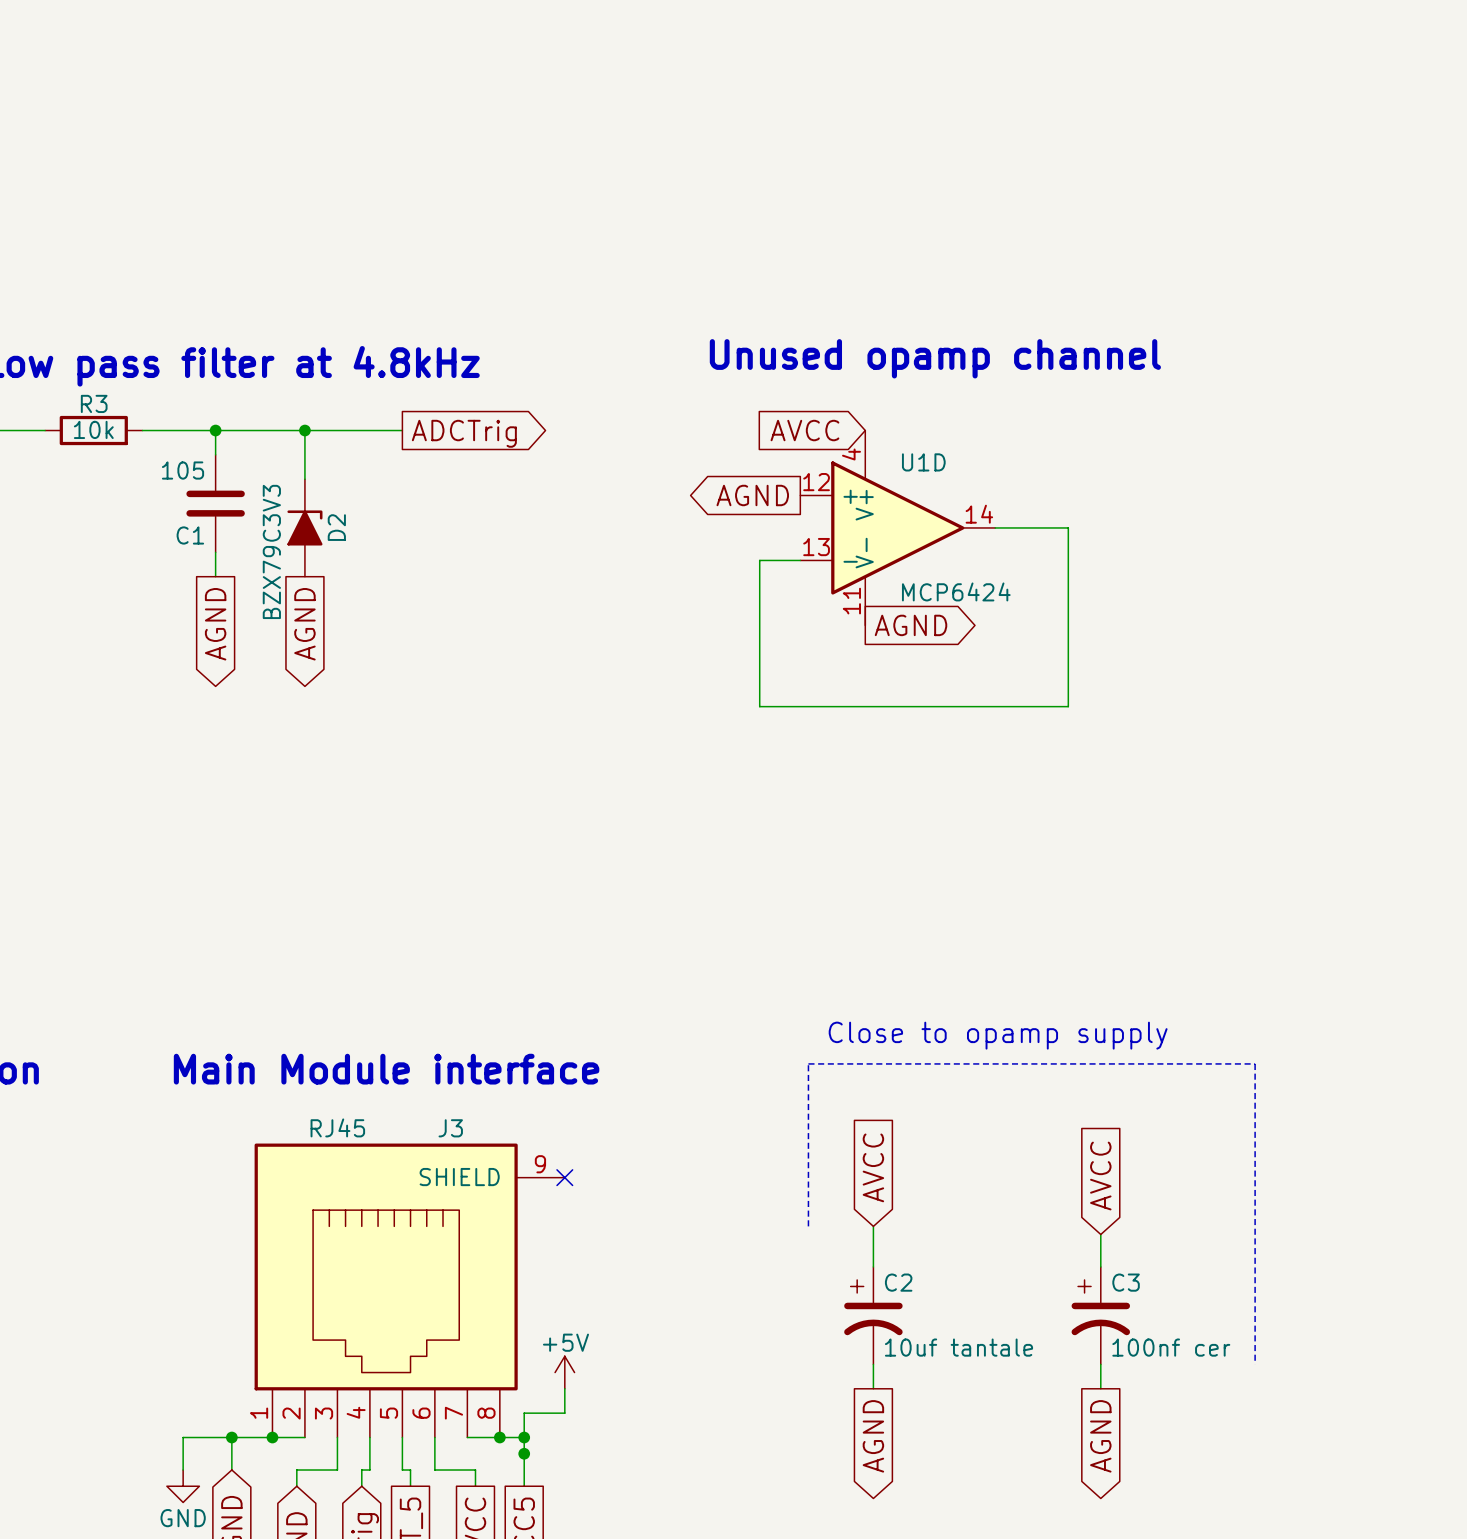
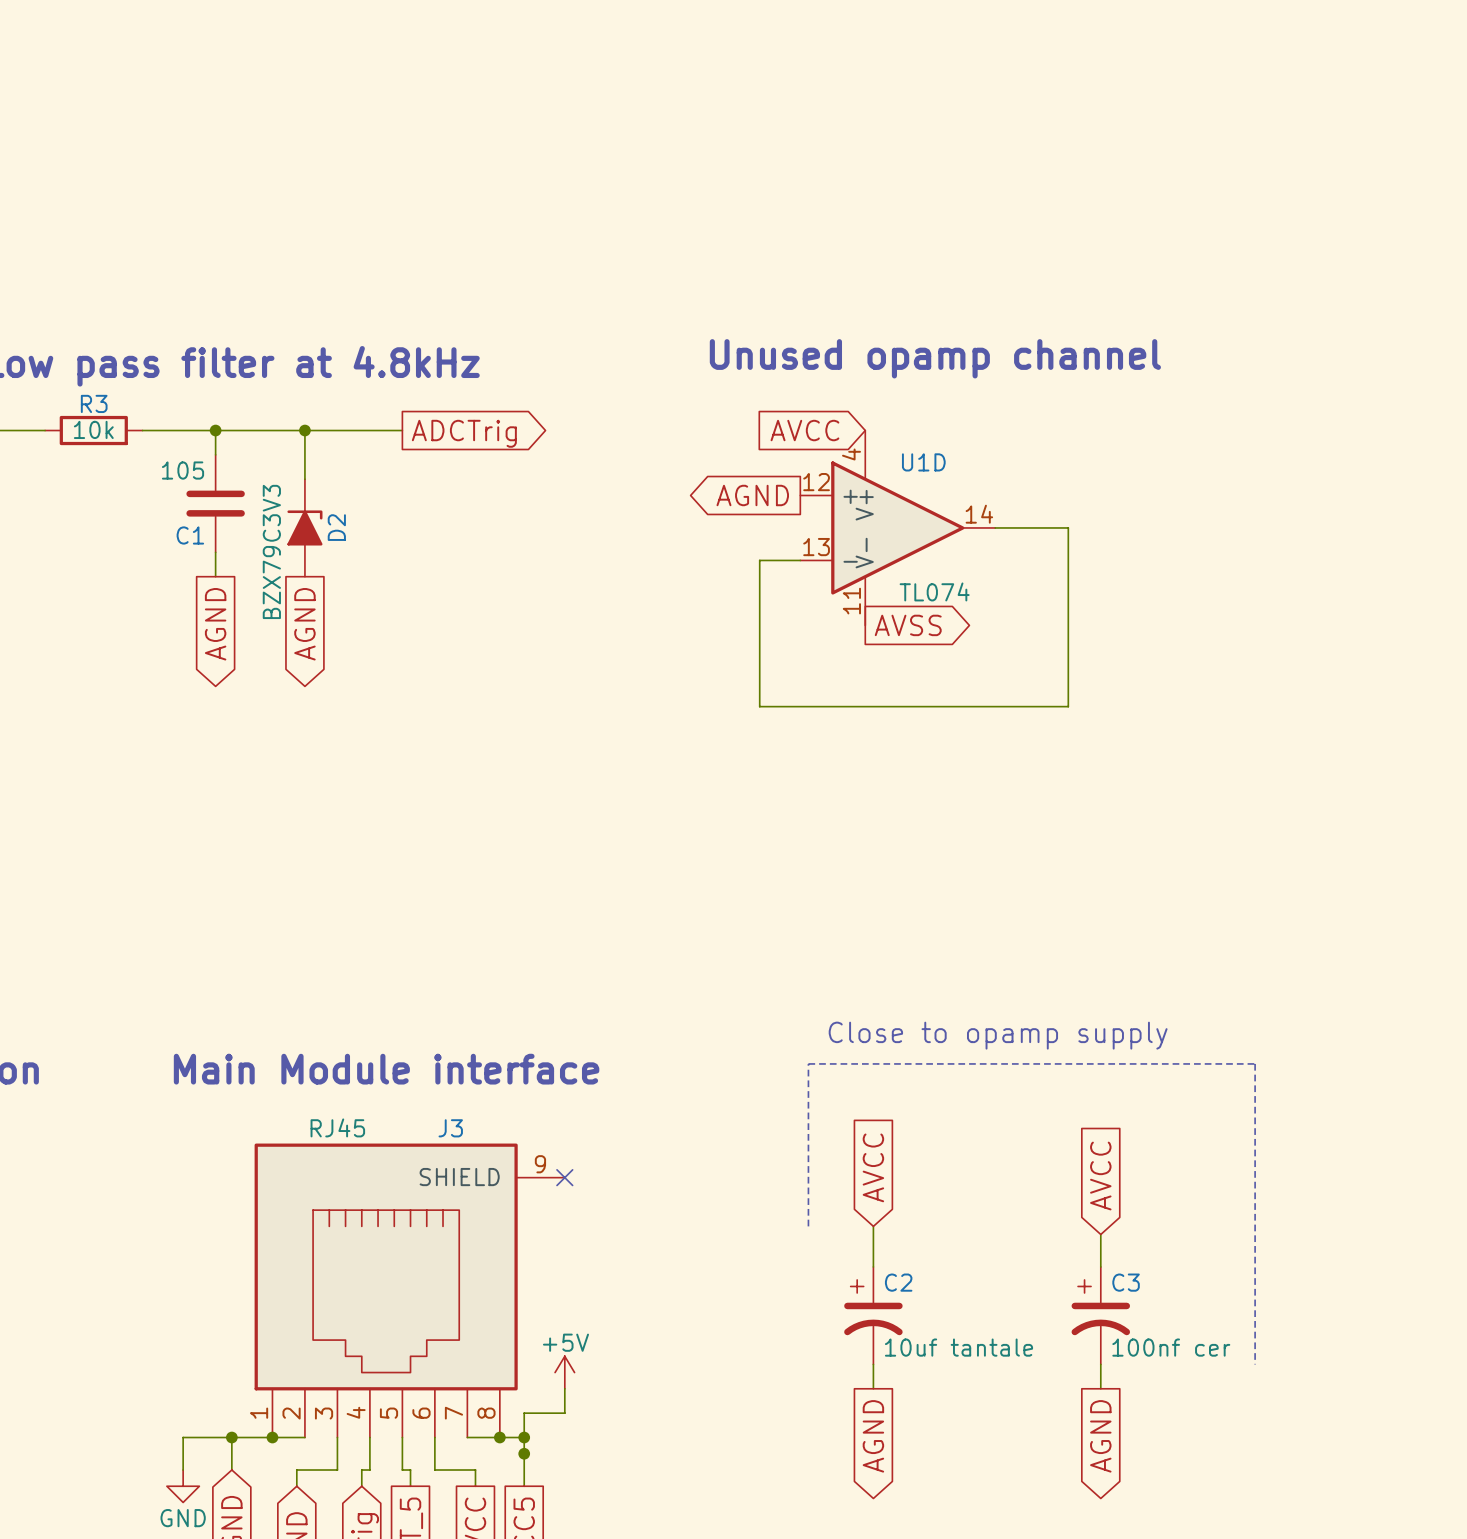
U1D value: MCP6424 (956, 591) -> TL074 (934, 591)
global label: AGND (911, 625) -> AVSS (908, 625)

